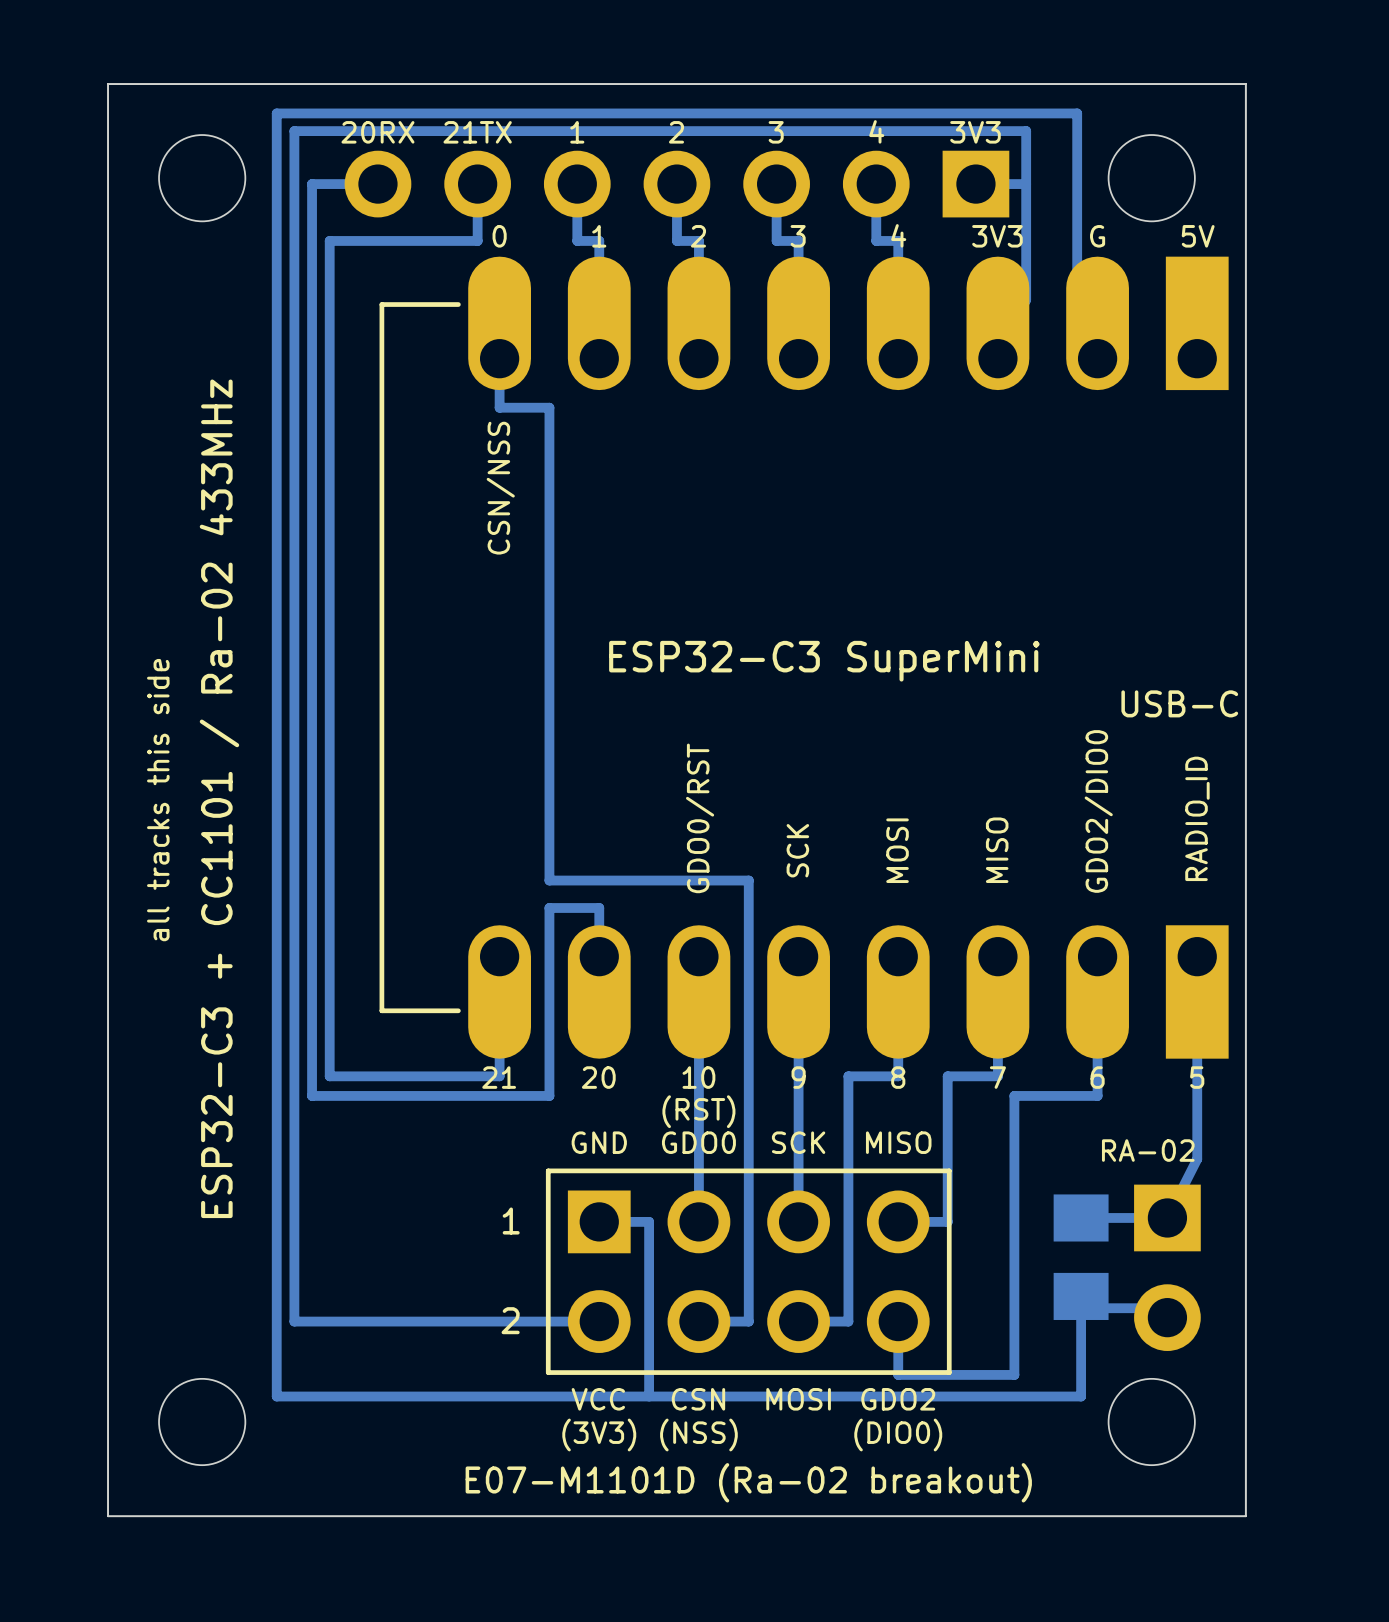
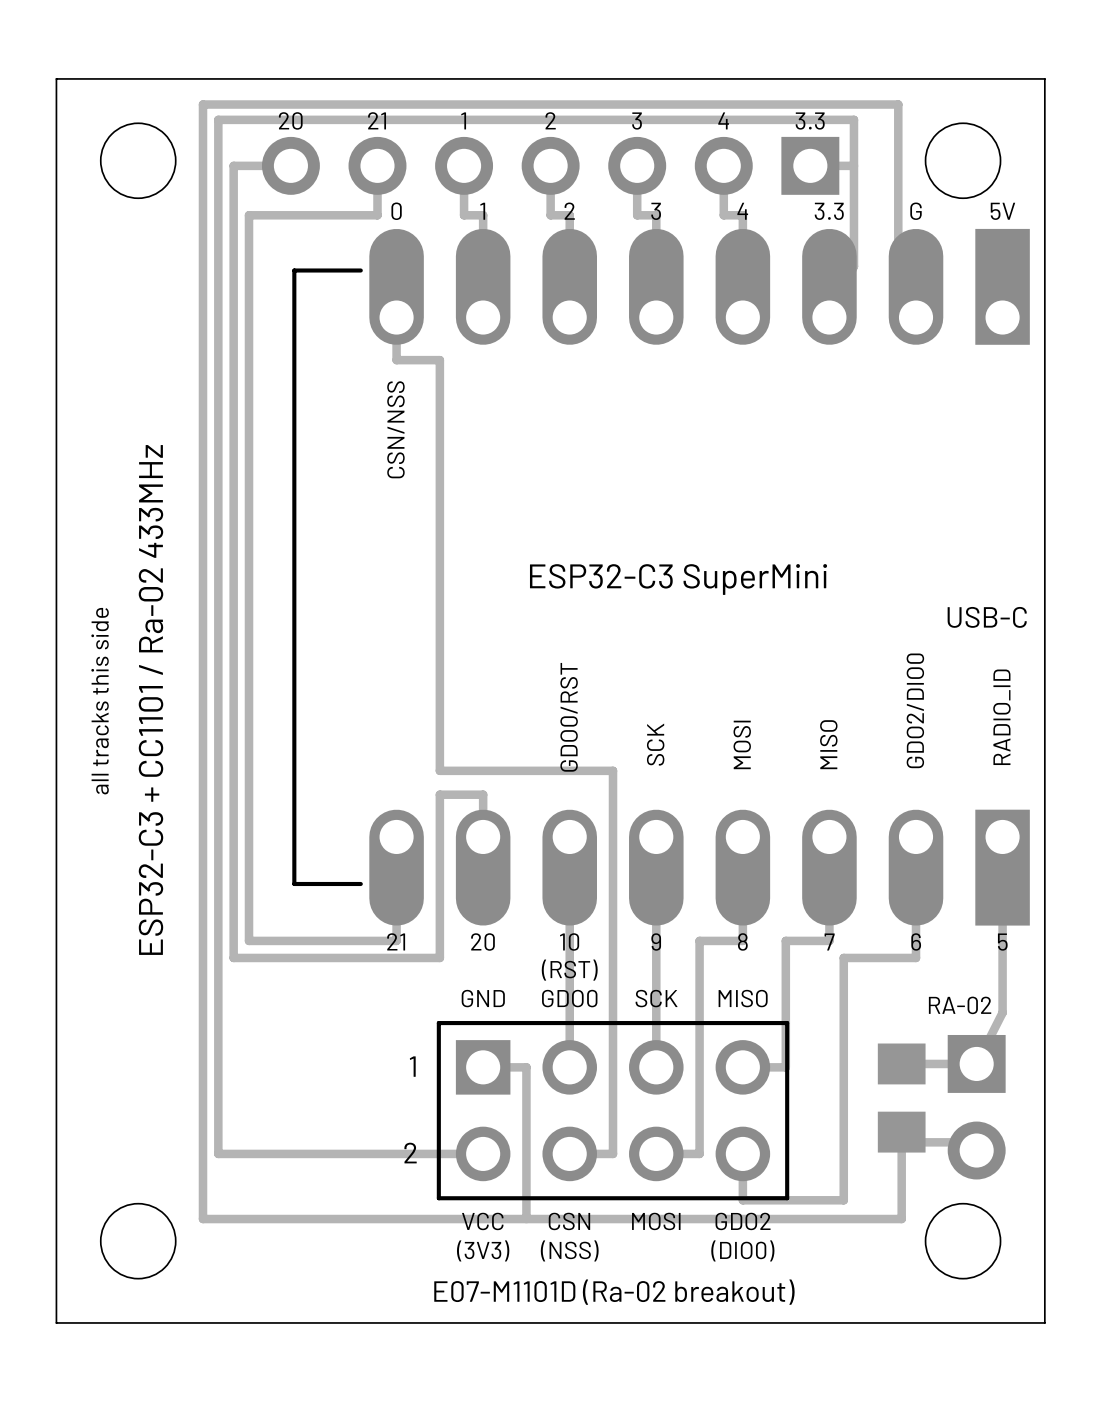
text: 20RX (377, 132) -> 20 (290, 120)
text: 21TX (477, 132) -> 21 (377, 120)
text: 3V3 (975, 132) -> 3.3 (810, 121)
text: 3V3 (997, 236) -> 3.3 (829, 211)

